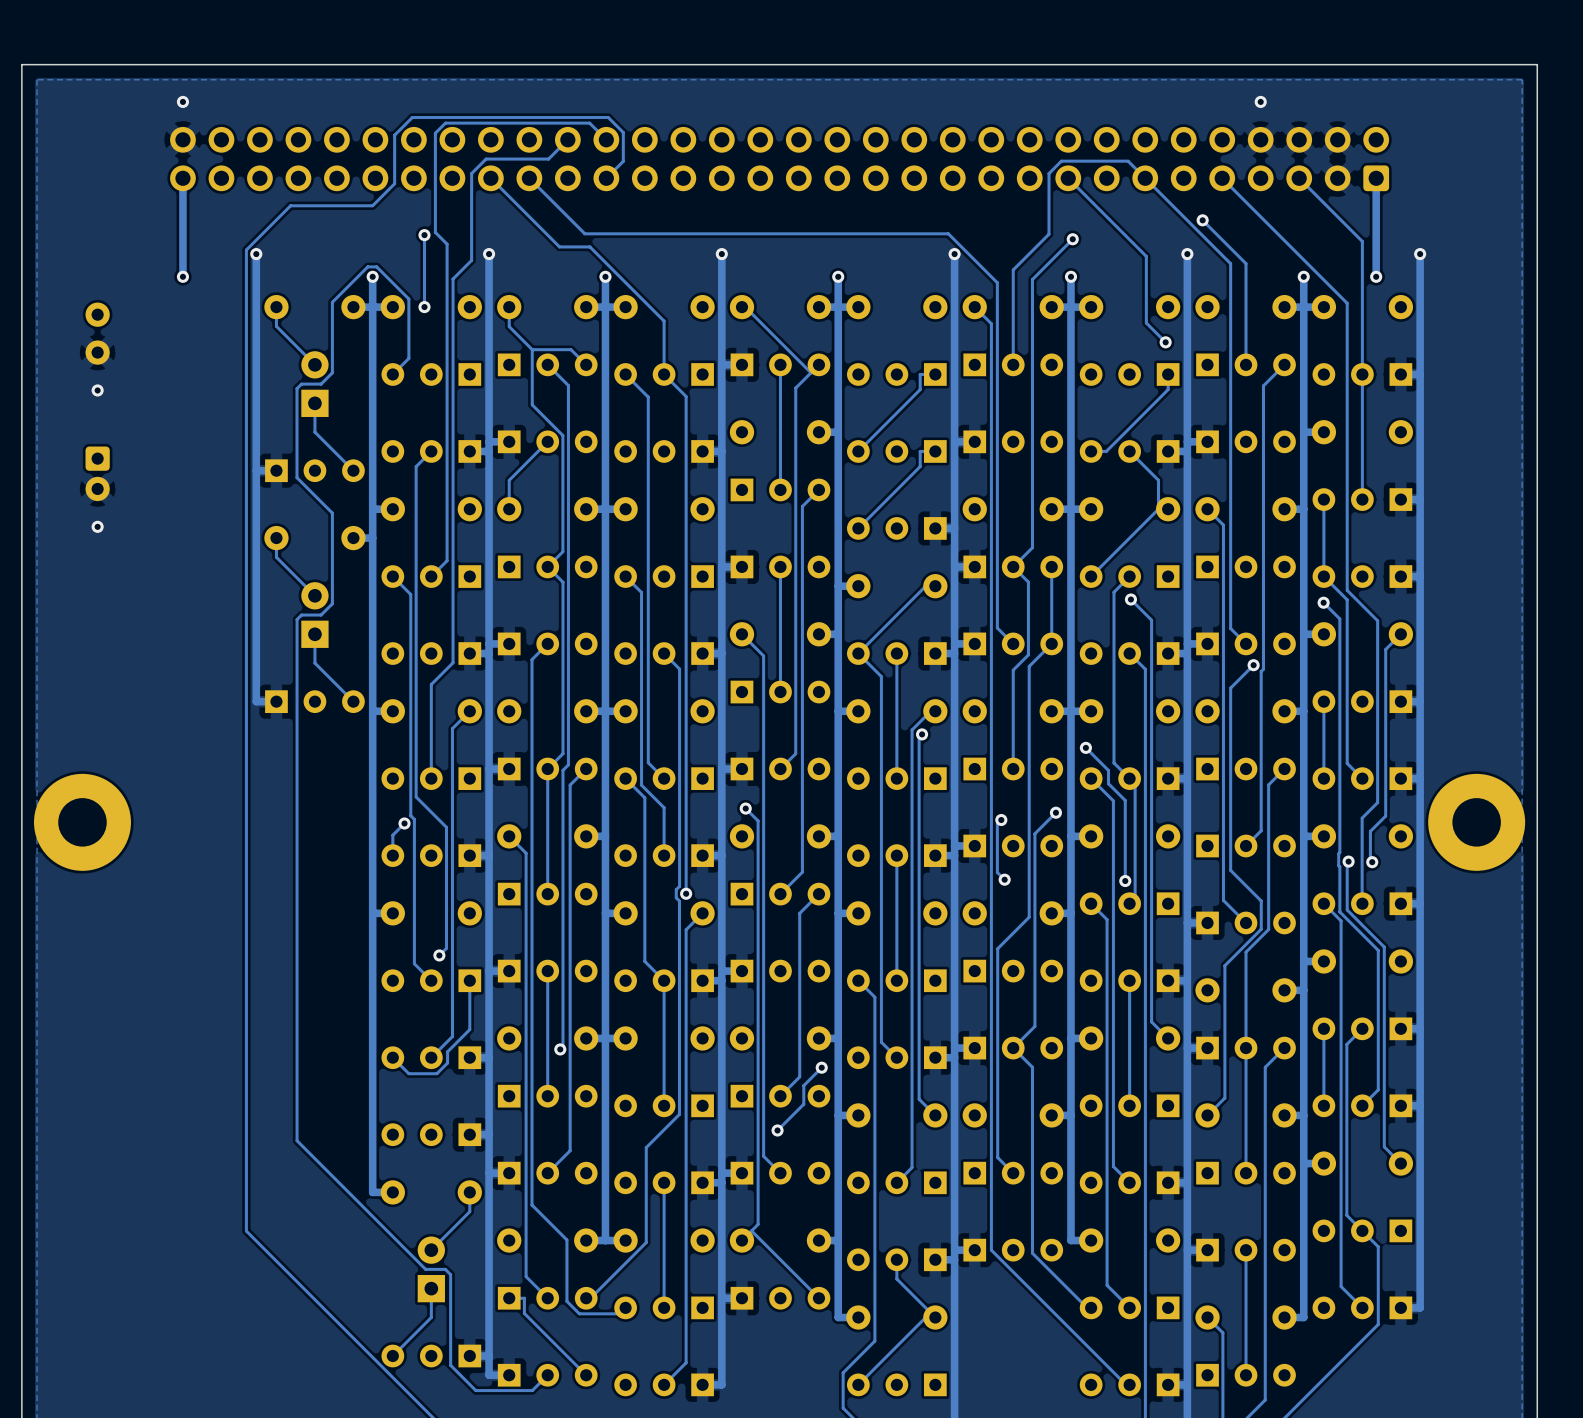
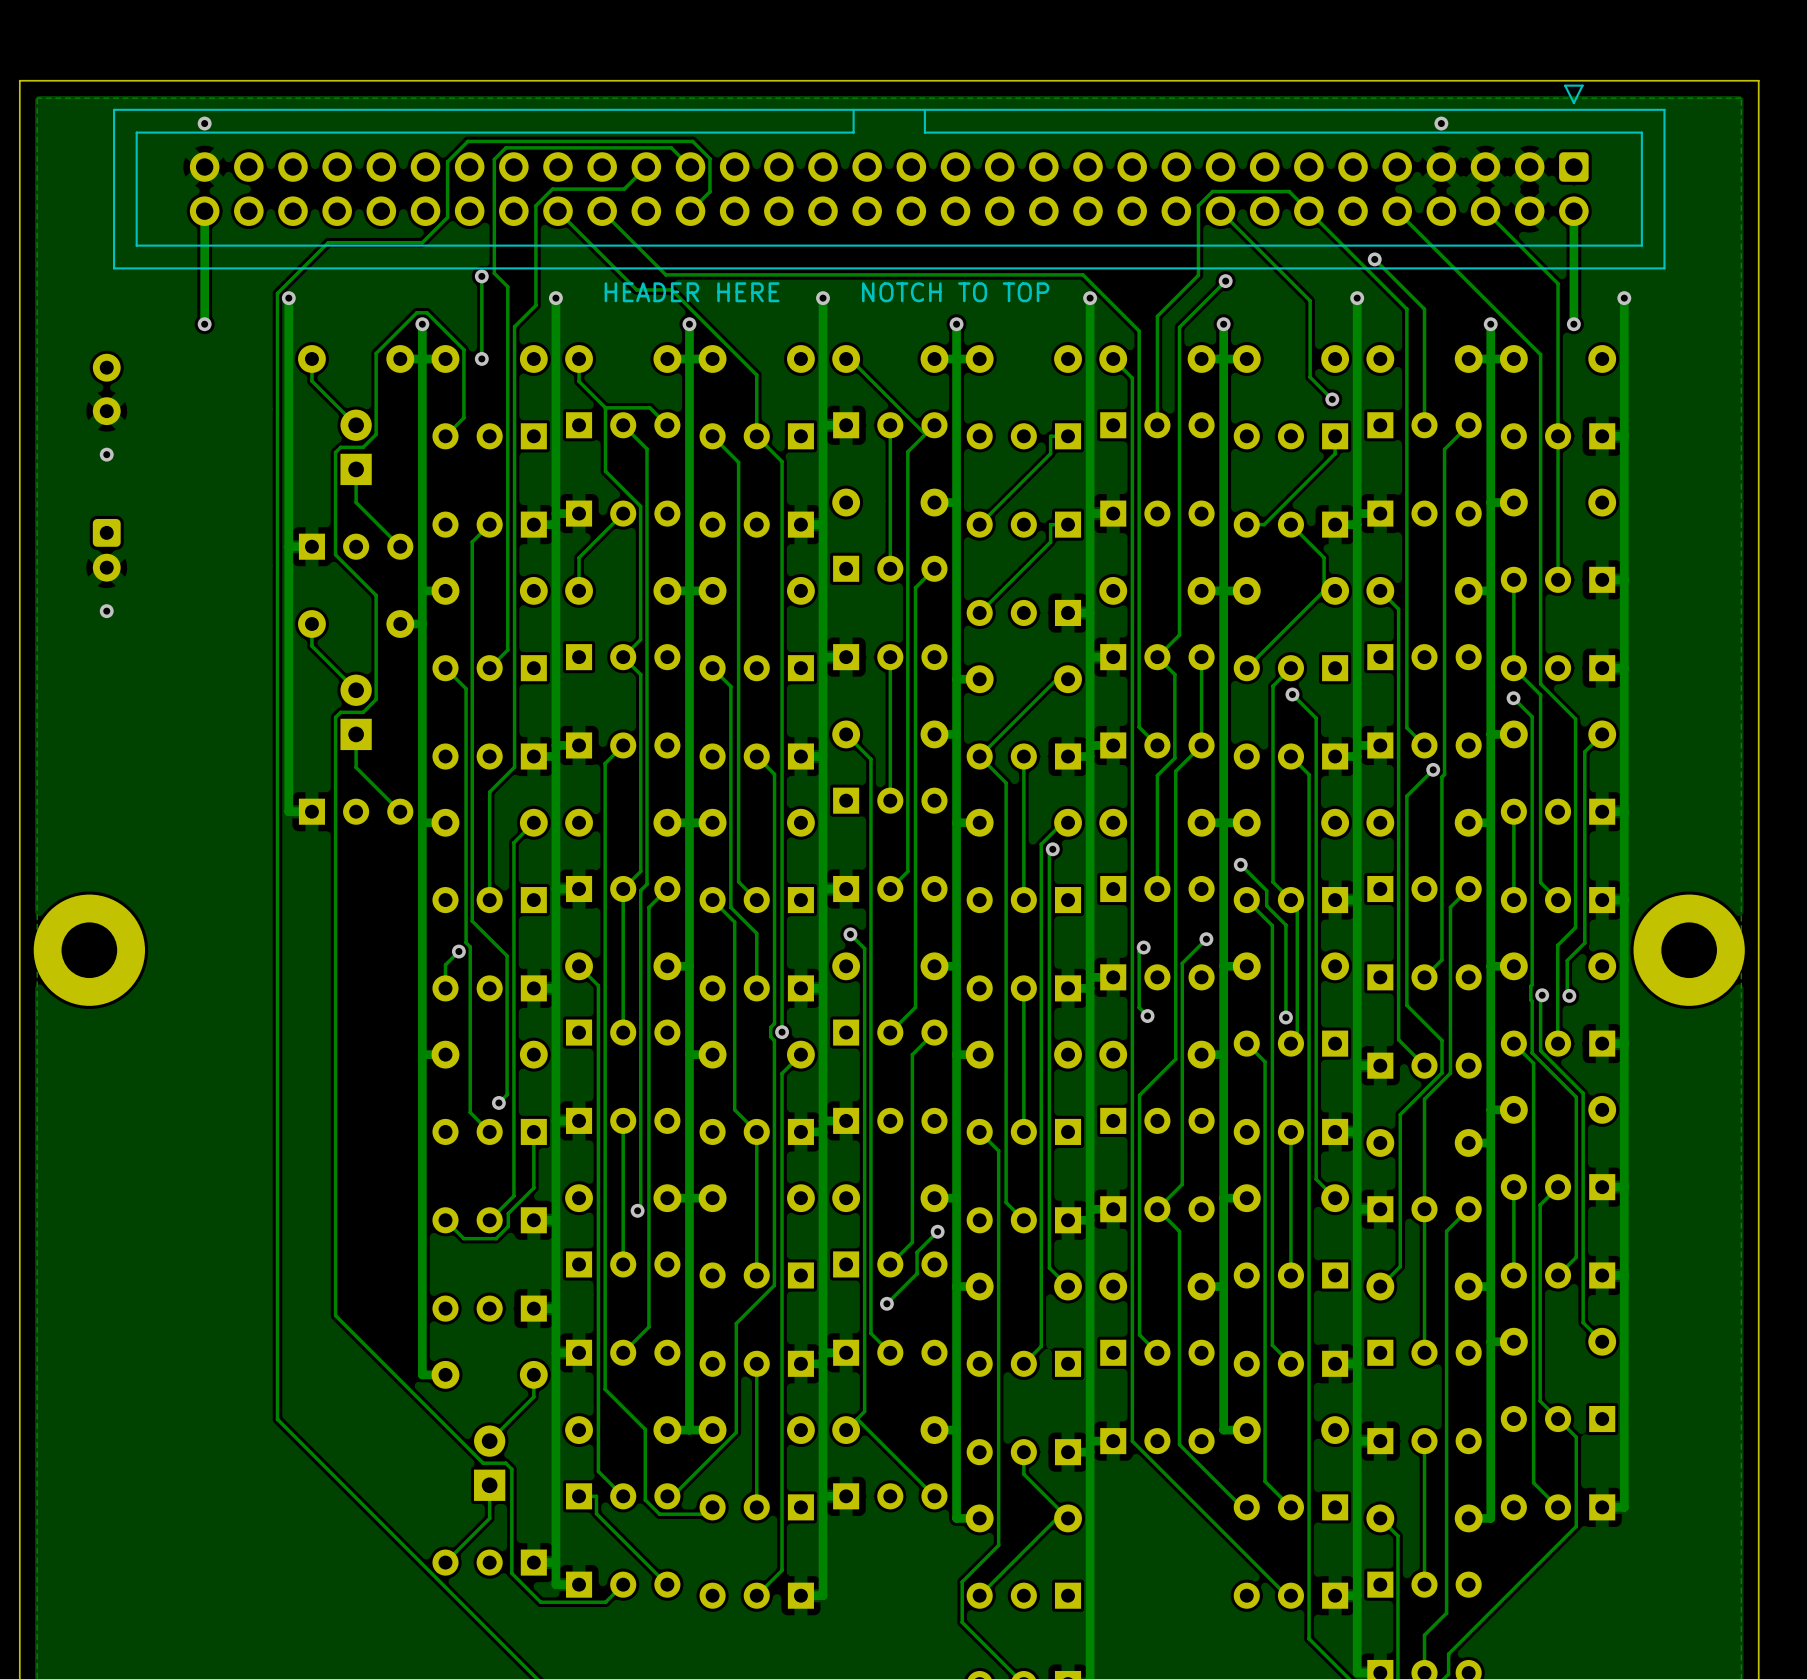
part side: top (779, 159) -> bottom (889, 177)
text: none -> HEADER HERE (692, 292)
text: none -> NOTCH TO TOP (955, 292)

